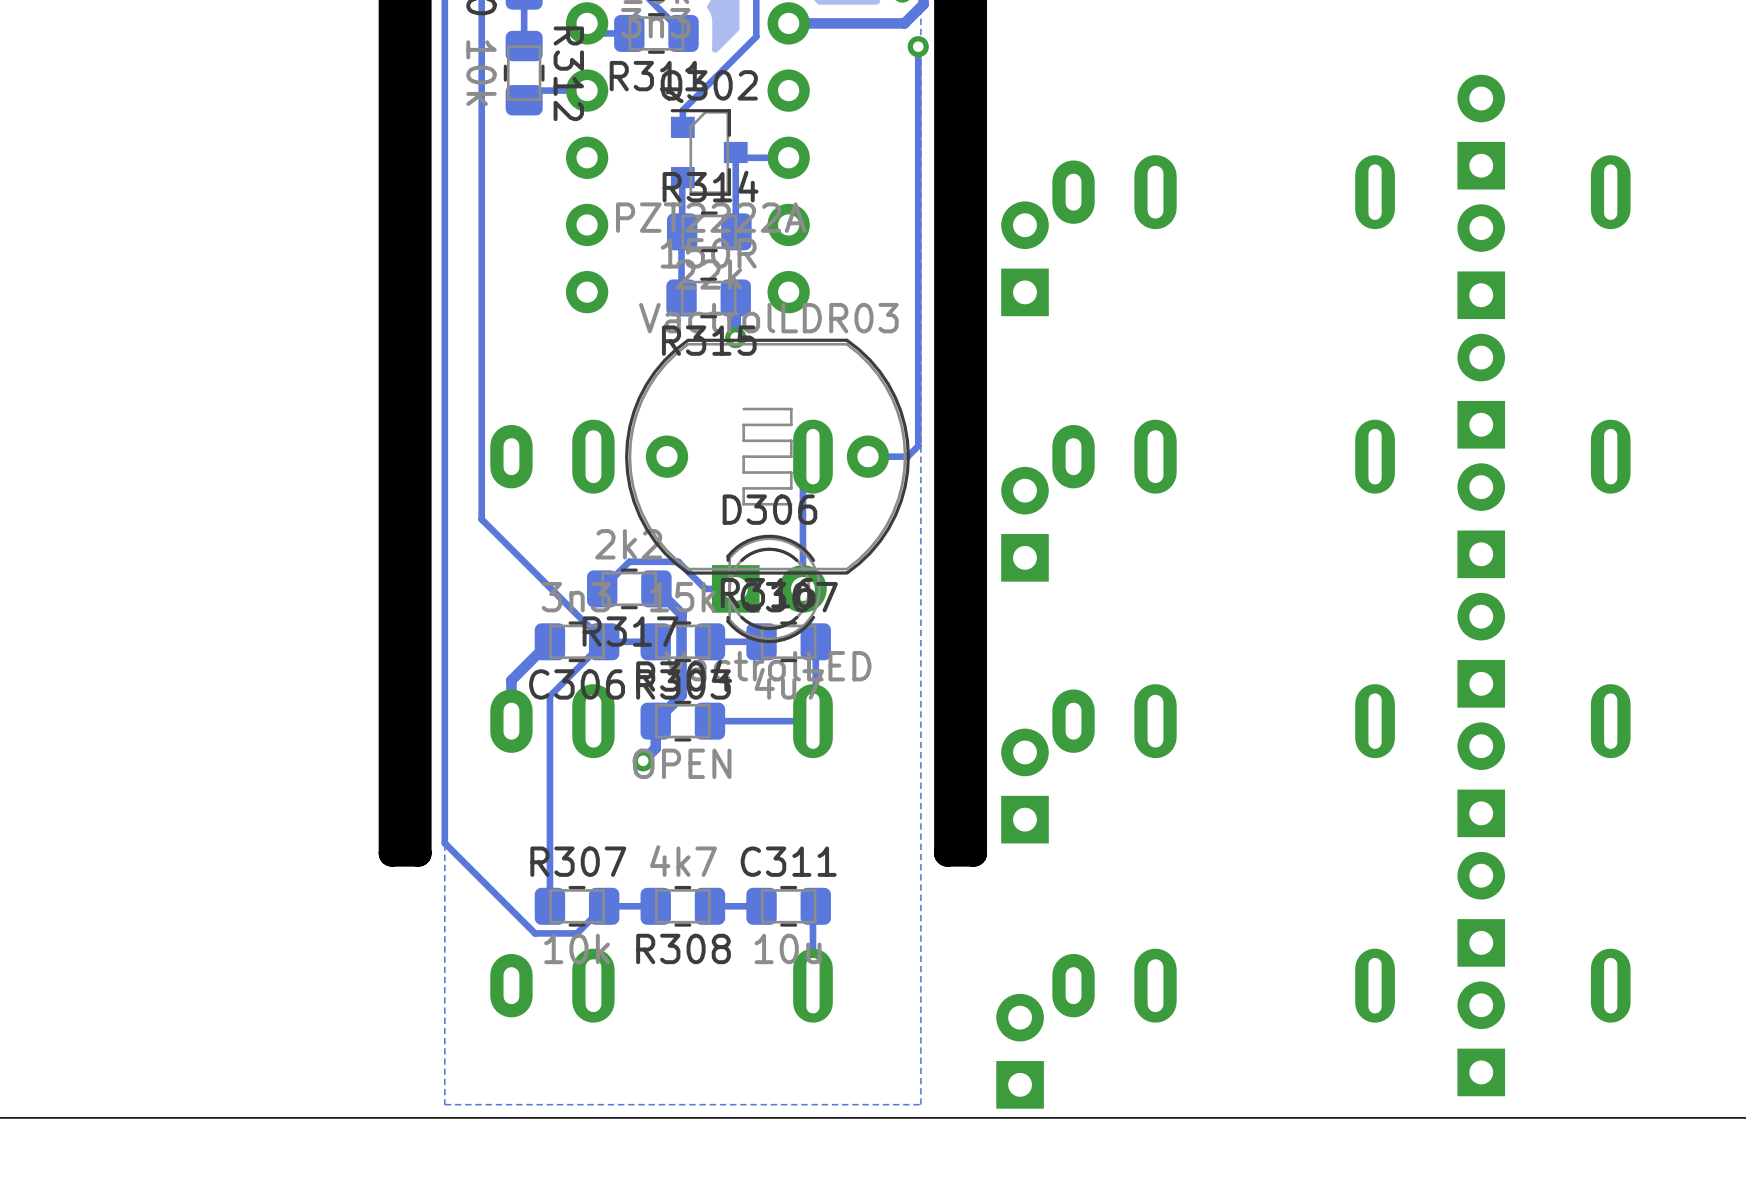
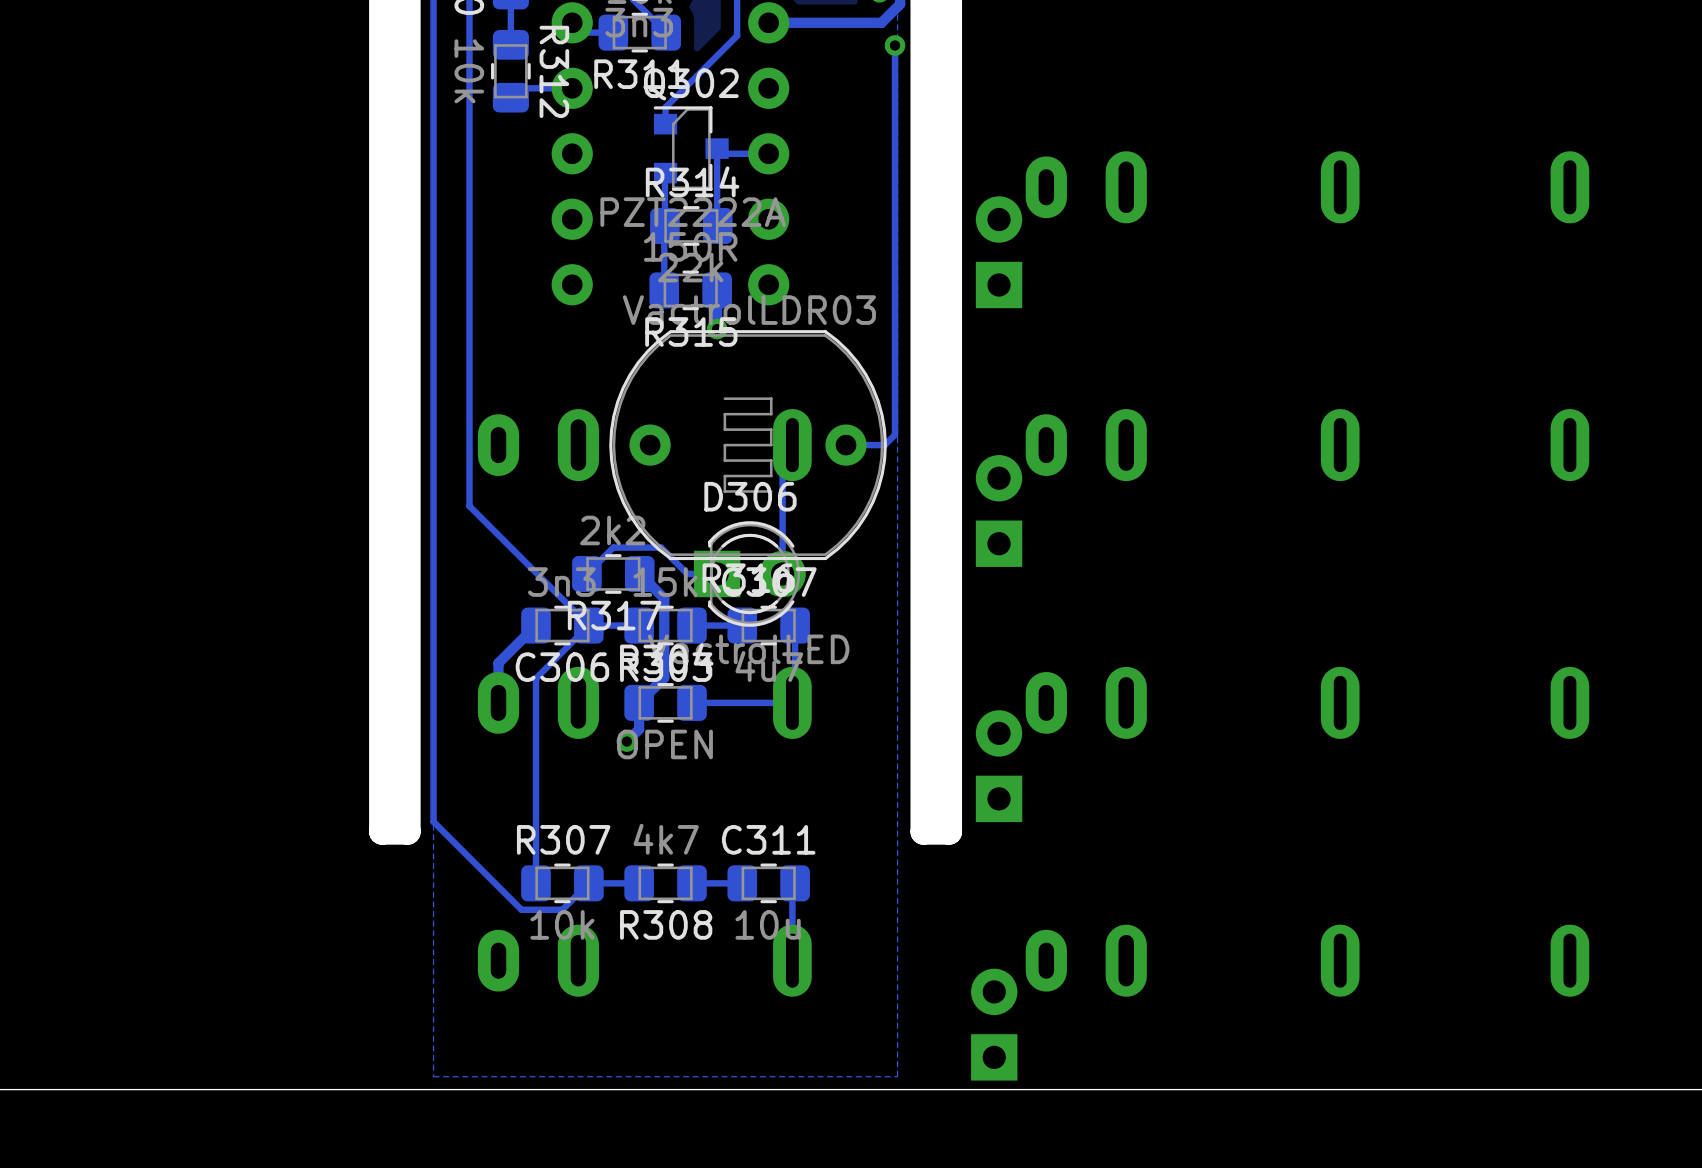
part: (1481, 132) -> none
part: (1481, 261) -> none
part: (1481, 391) -> none
part: (1481, 520) -> none
part: (1481, 650) -> none
part: (1481, 779) -> none
part: (1481, 909) -> none
part: (1481, 1038) -> none

